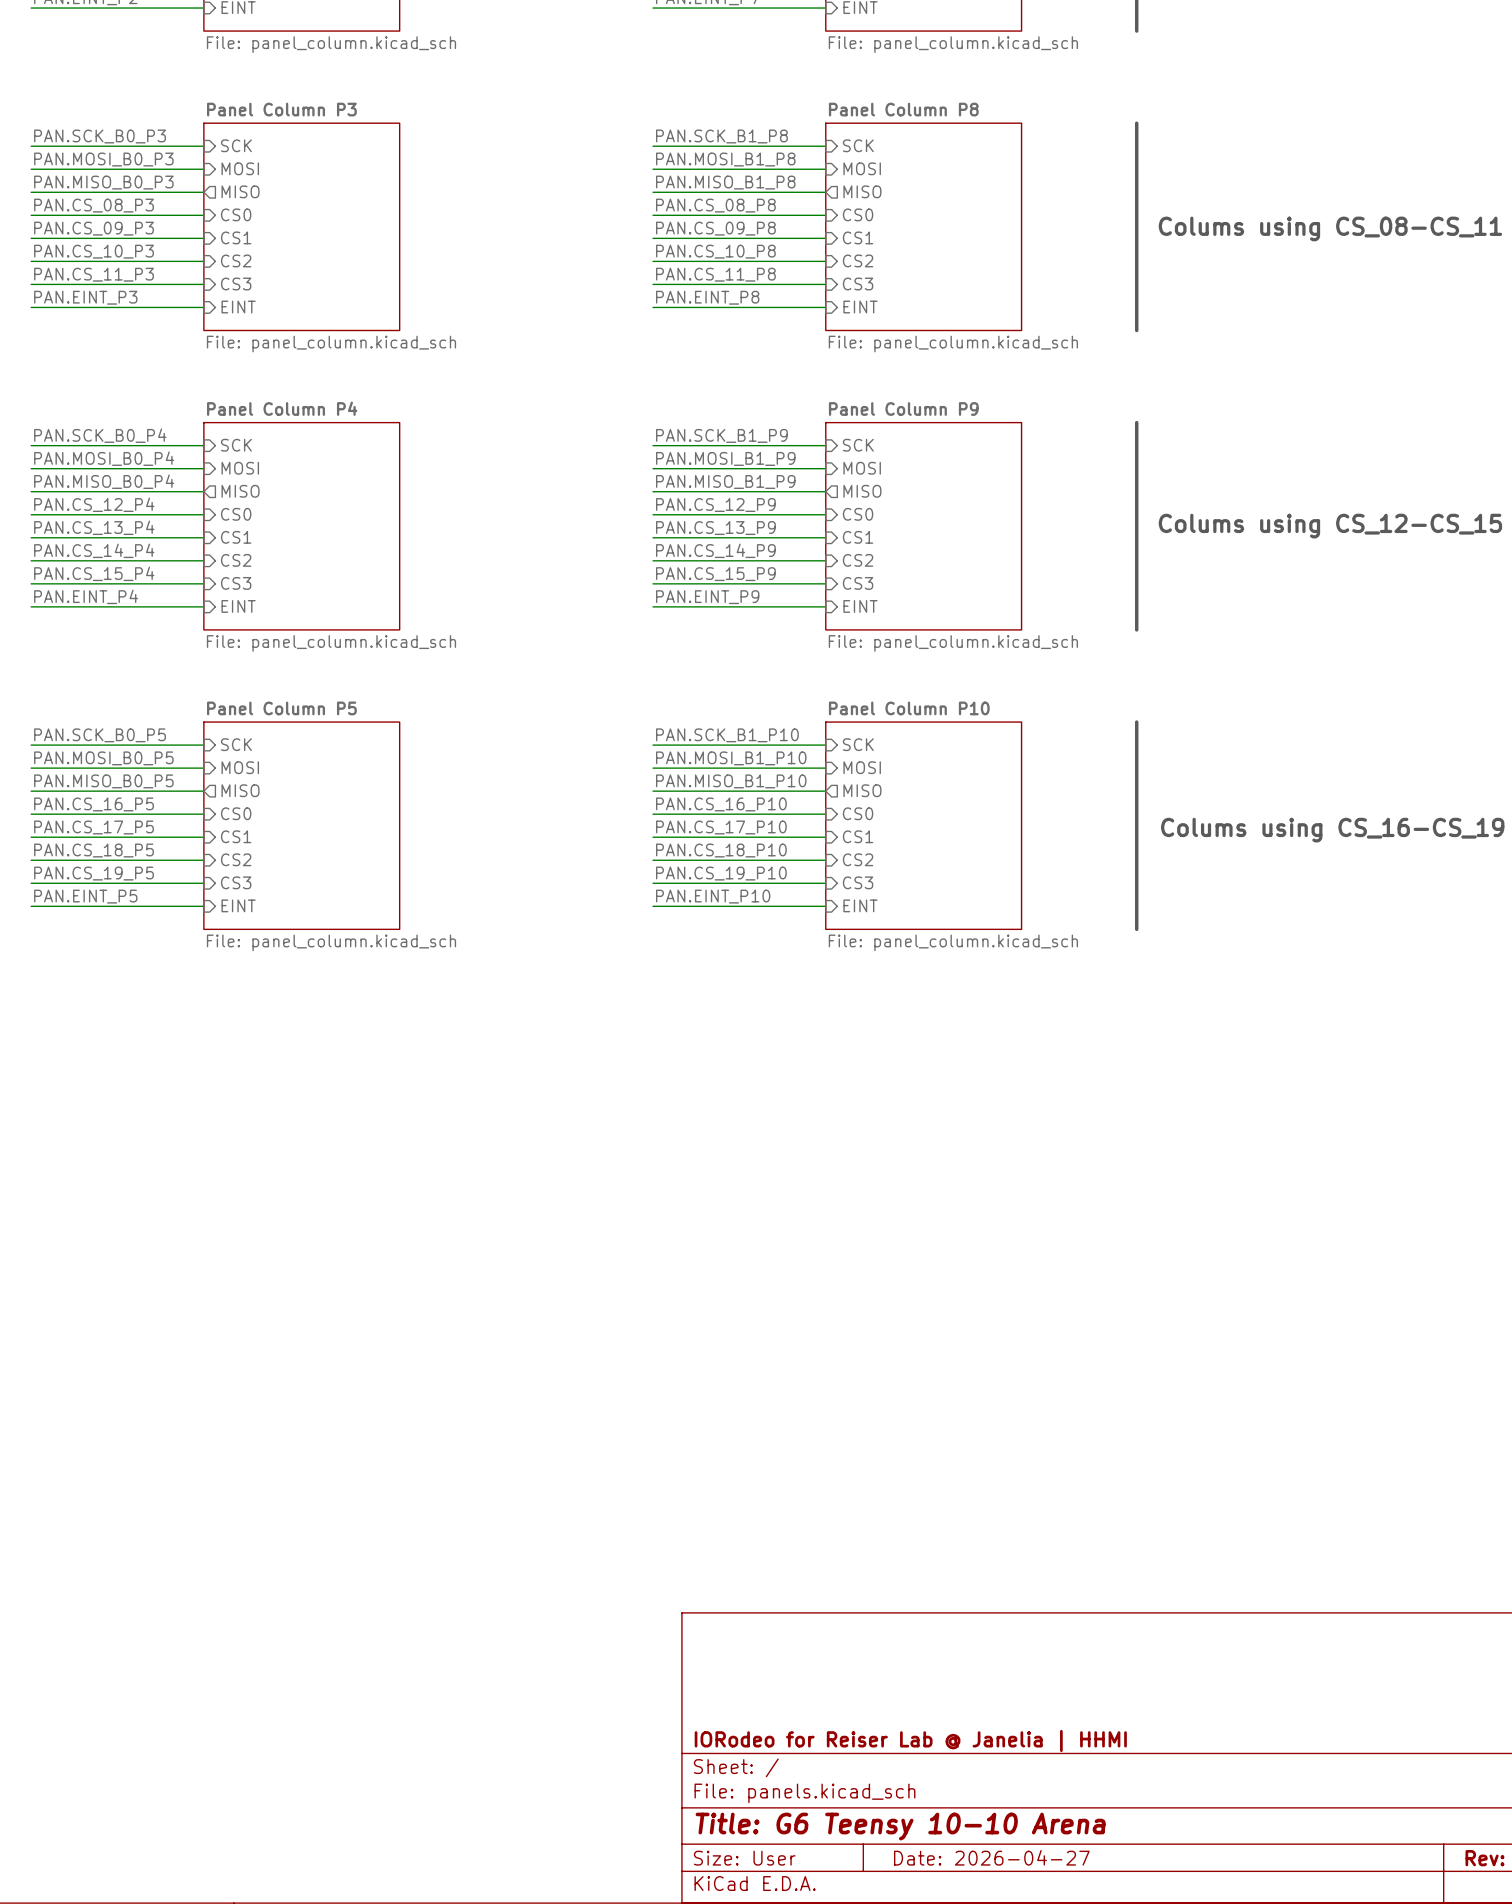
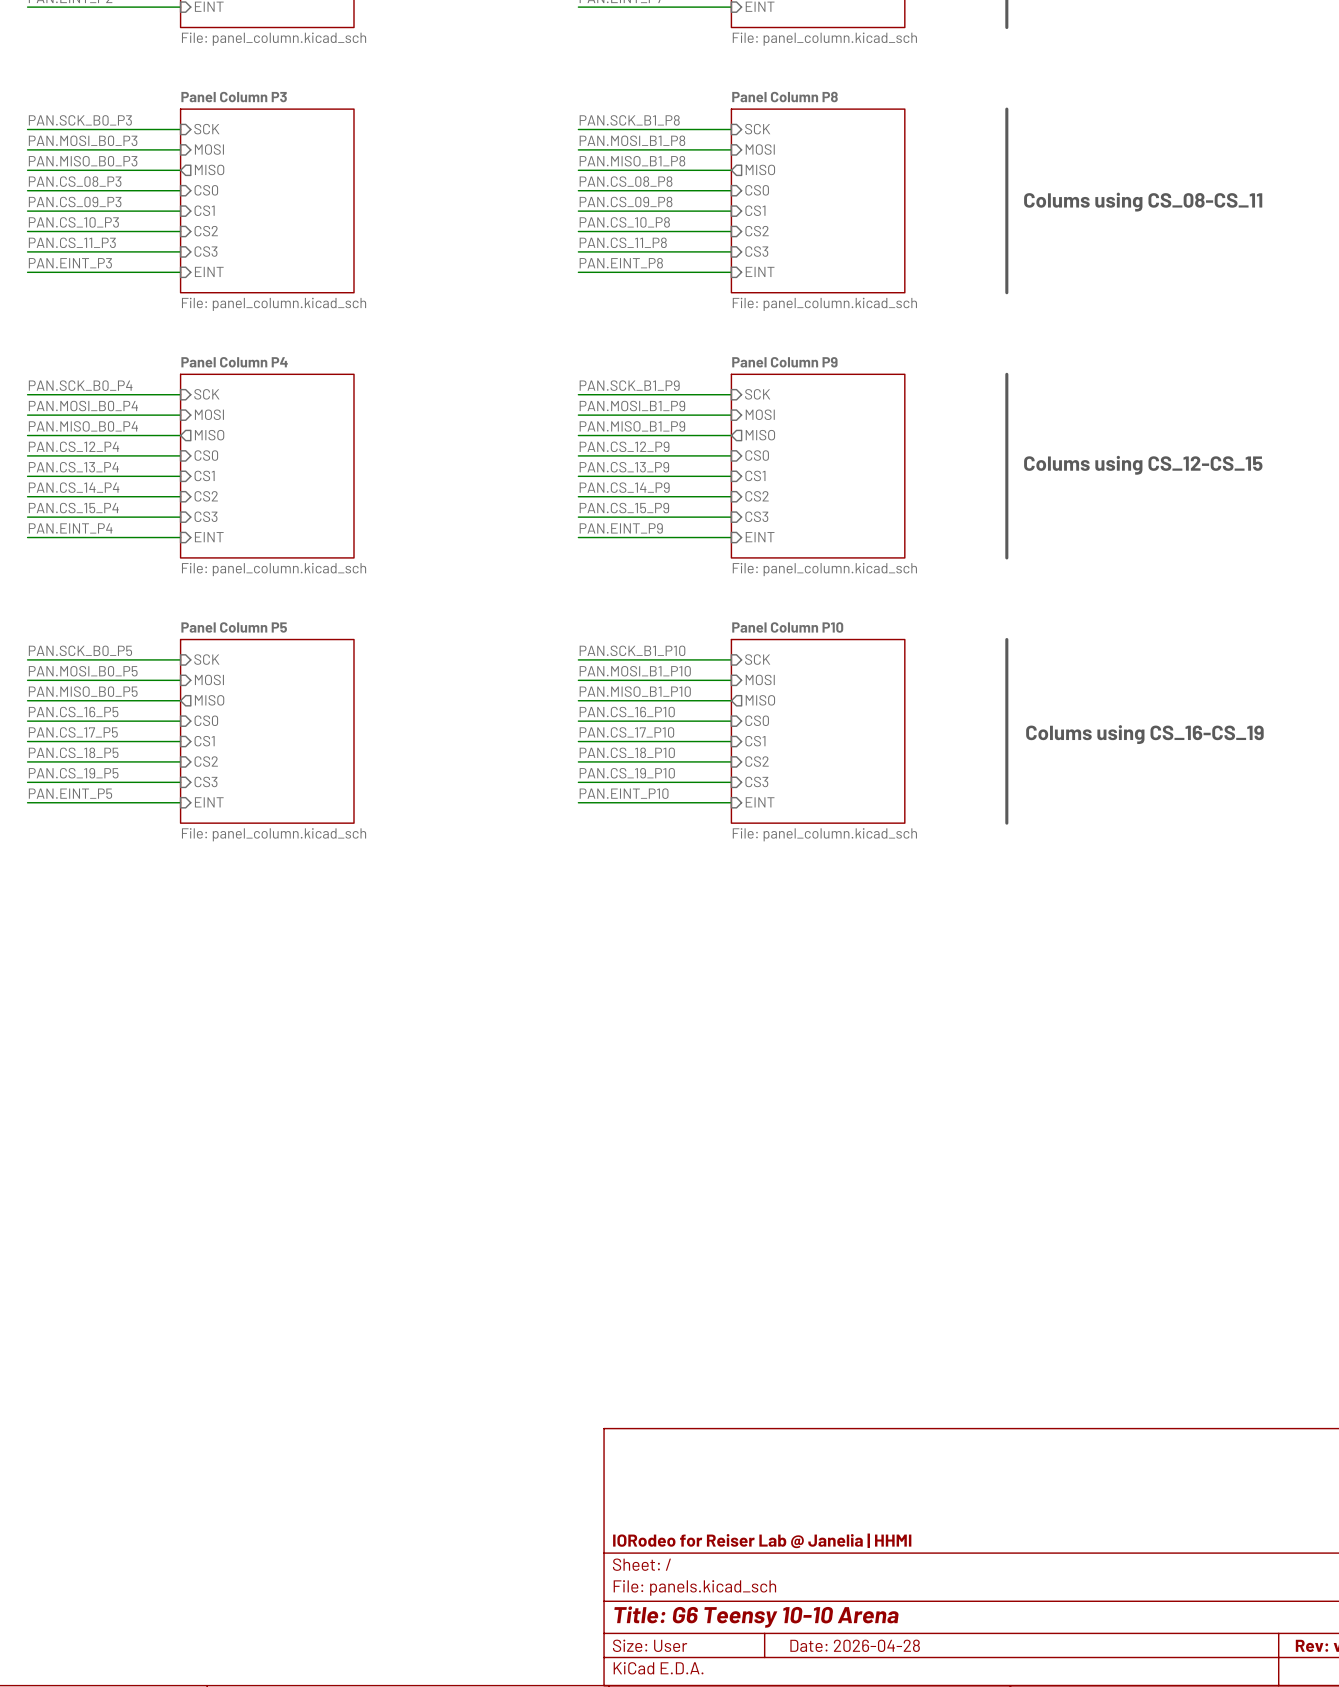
title block: Date: 2026-04-27 (991, 1857) -> Date: 2026-04-28 (855, 1645)

